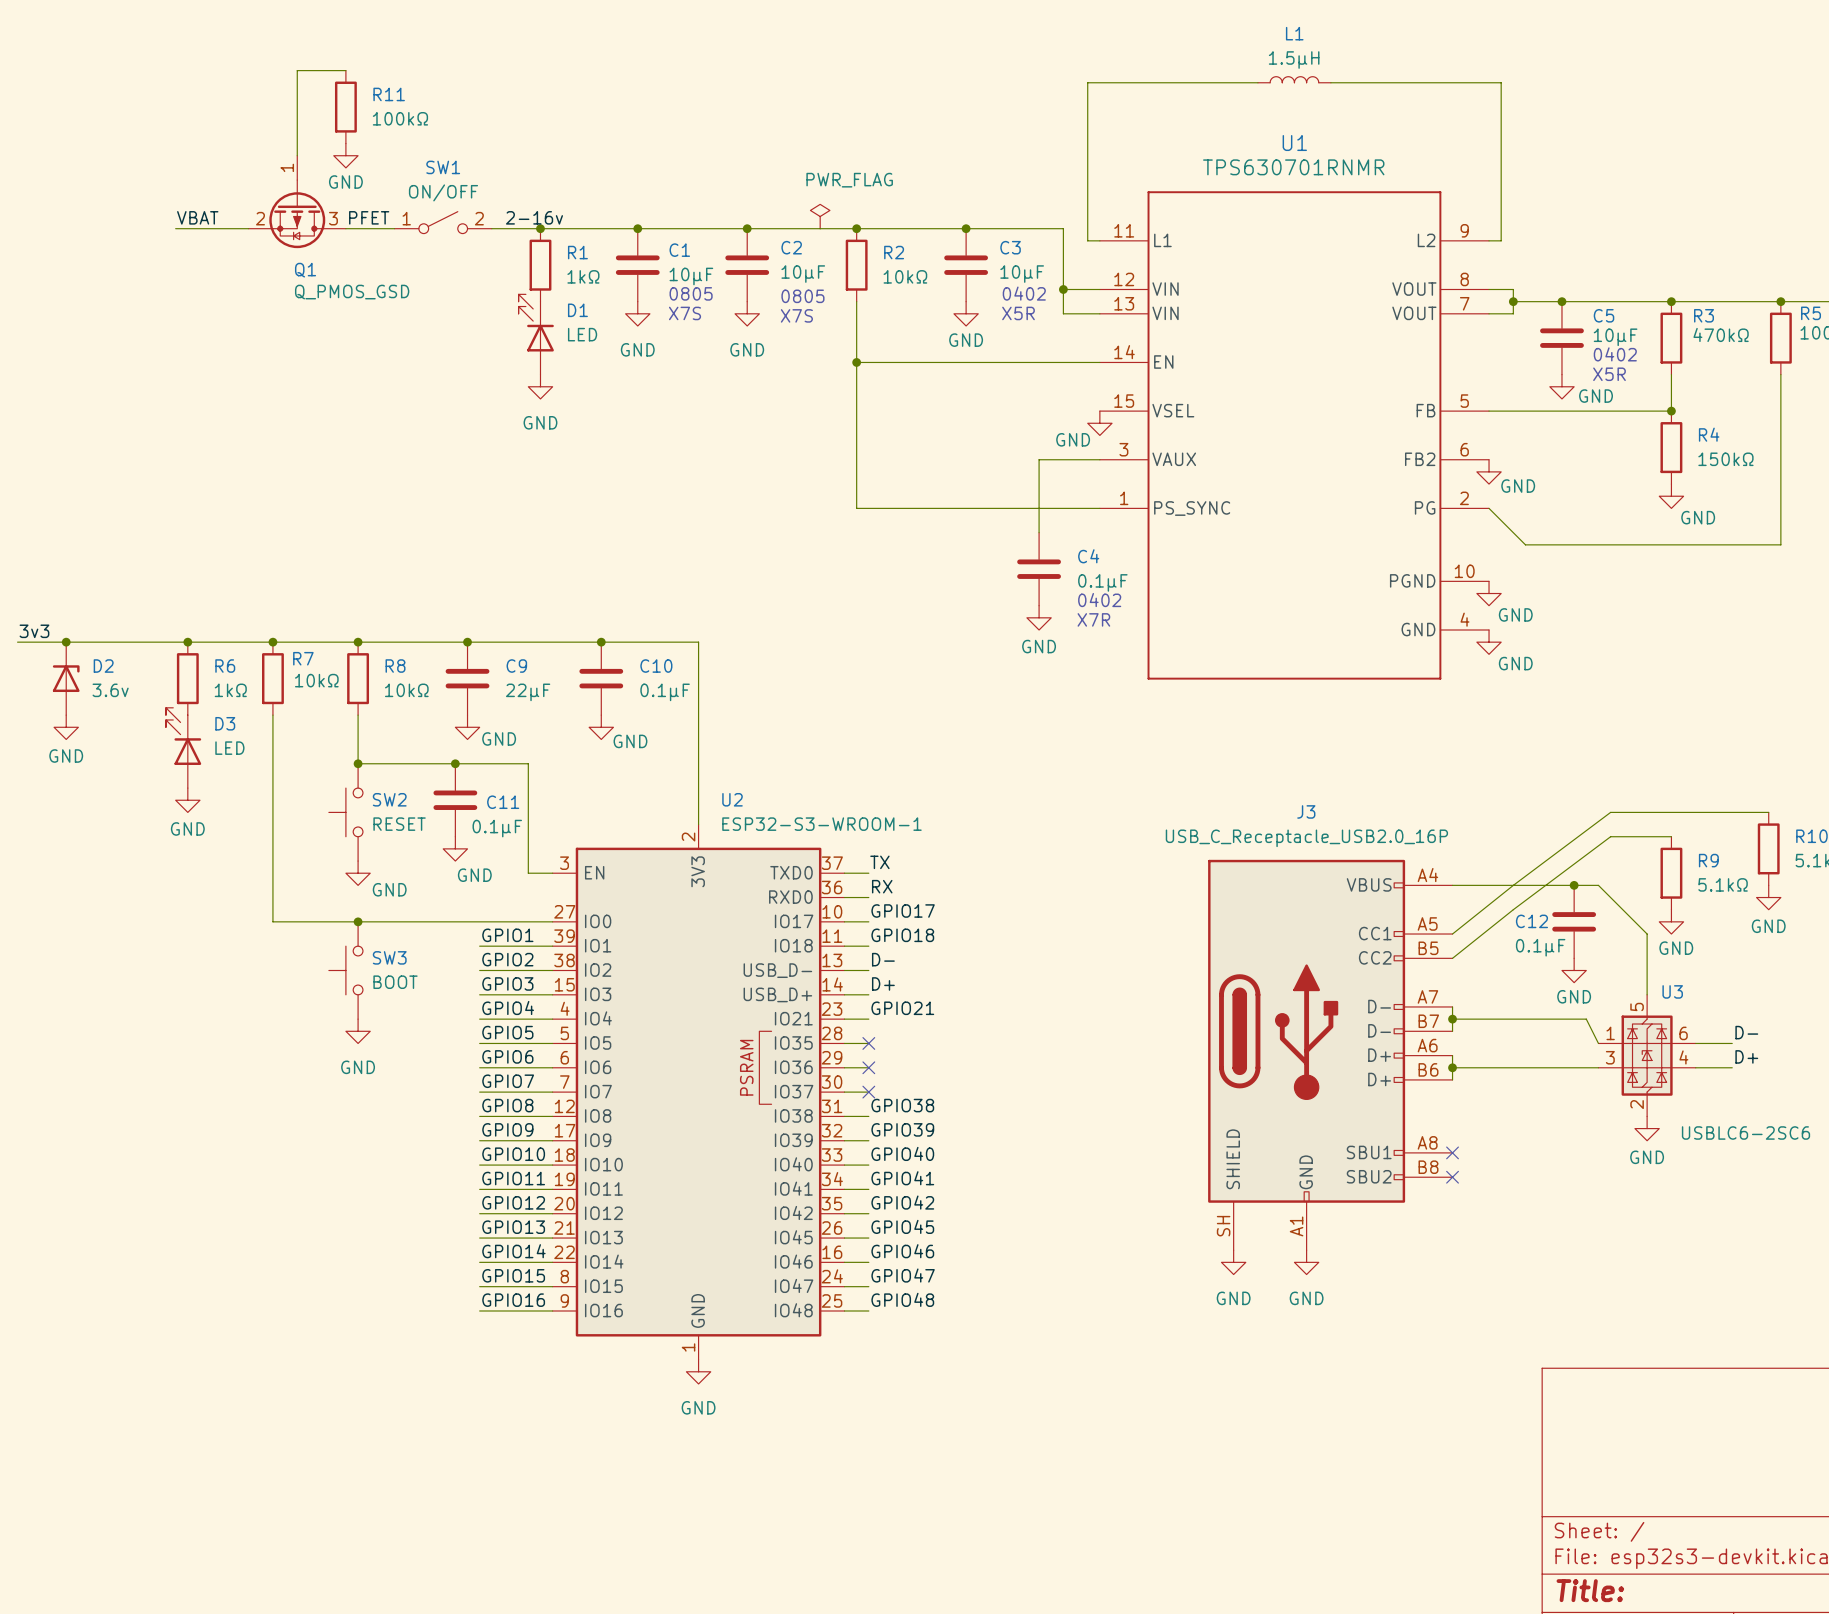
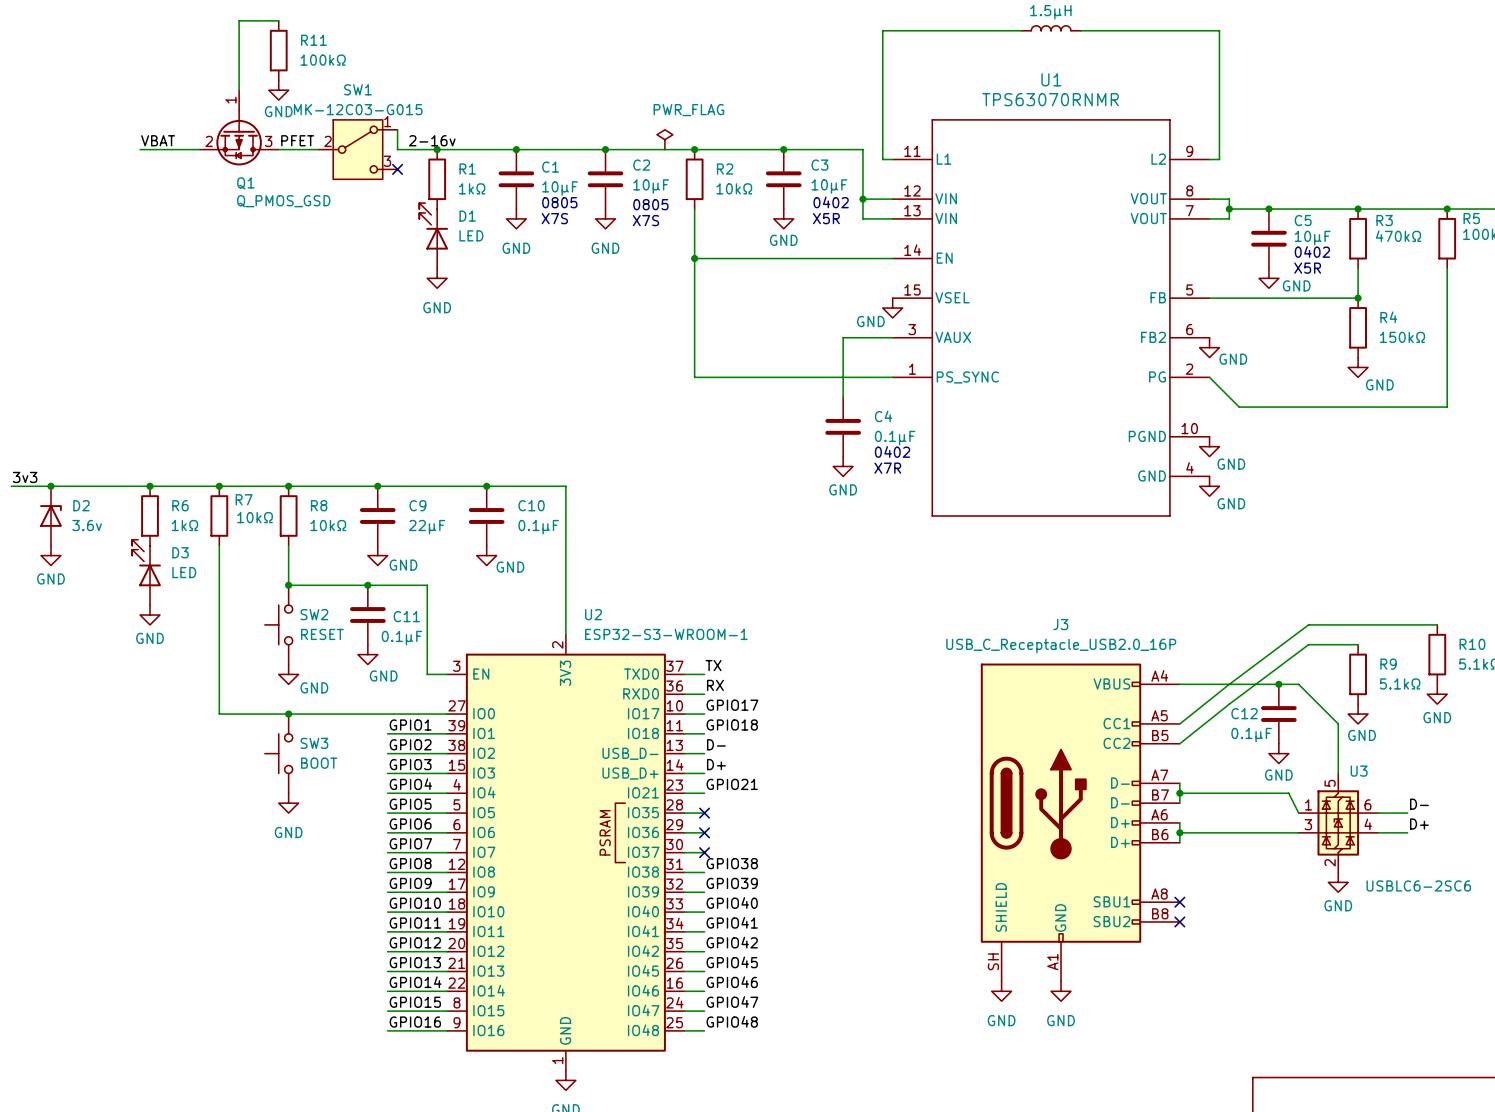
U1 value: TPS630701RNMR (1293, 167) -> TPS63070RNMR (1050, 99)
SW1 value: ON/OFF (443, 192) -> MK-12C03-G015 (358, 109)
wire: none -> (397, 129) (397, 149)
SW1 symbol: [394, 211, 492, 234] -> [318, 119, 398, 180]
no-connect mark: none -> (397, 169)

